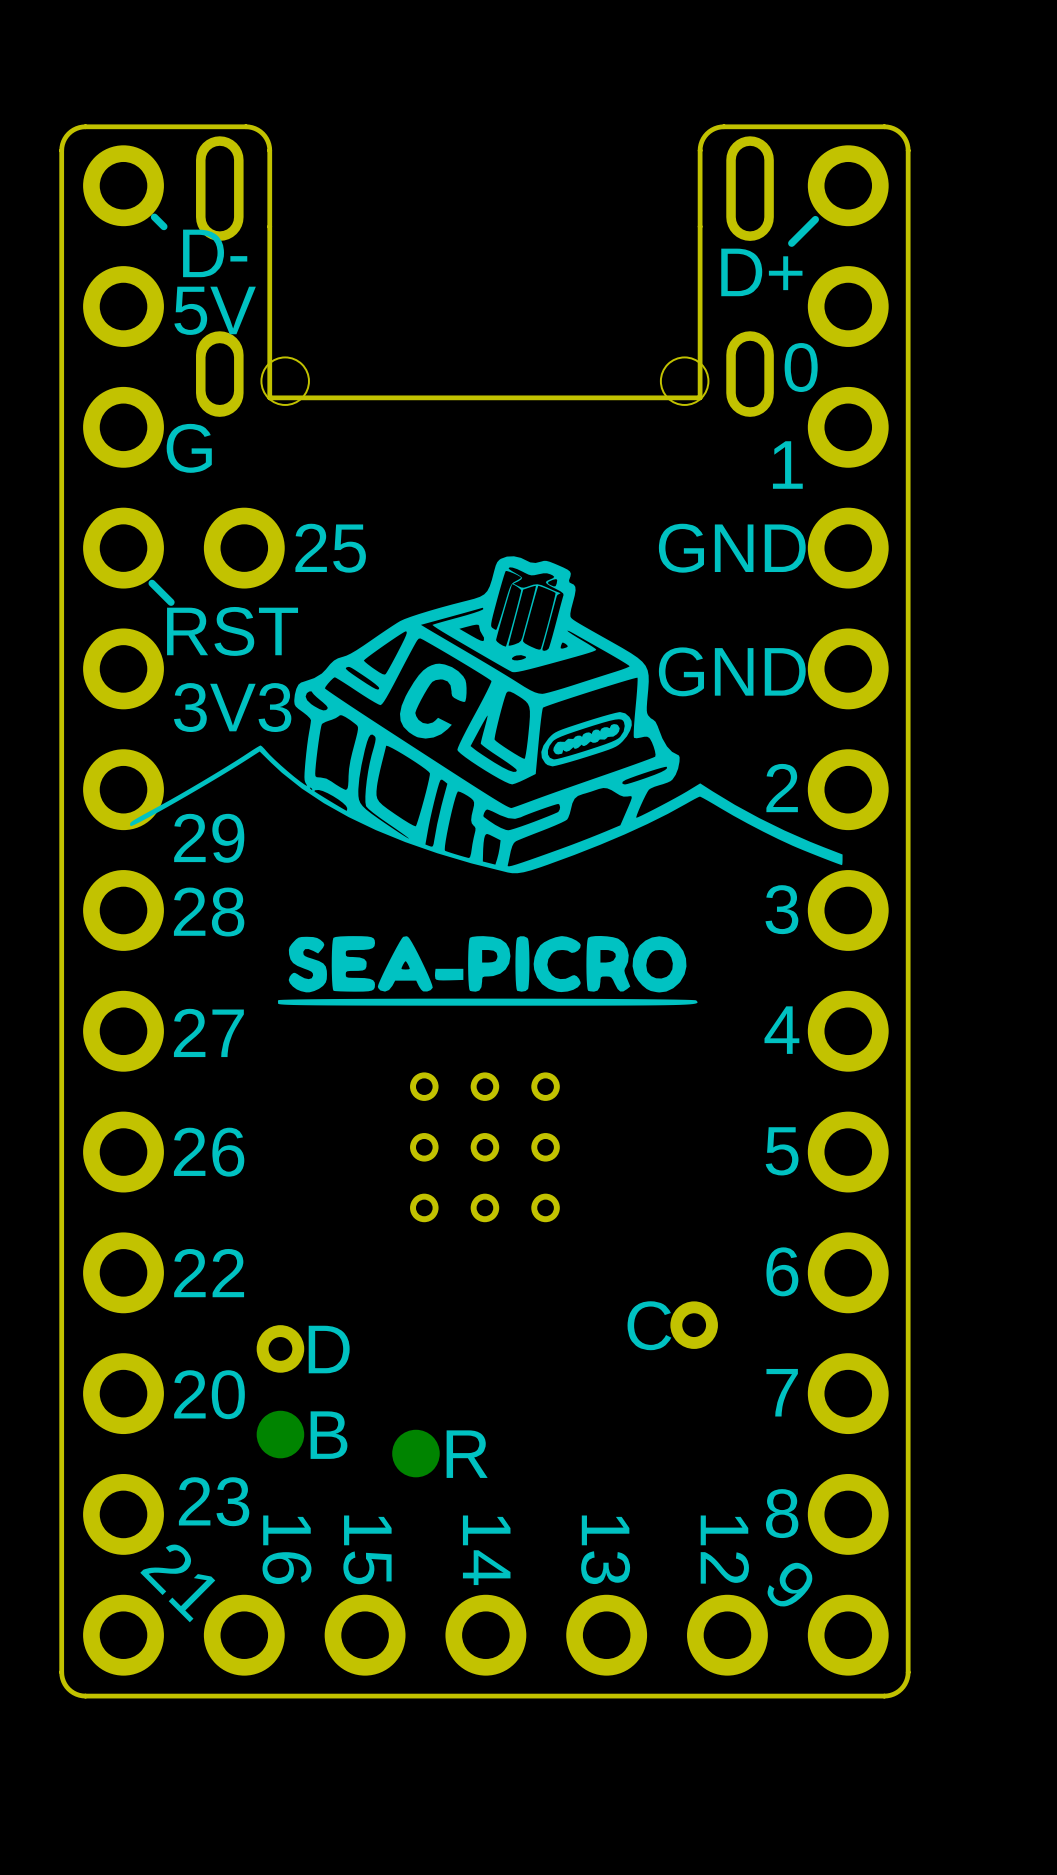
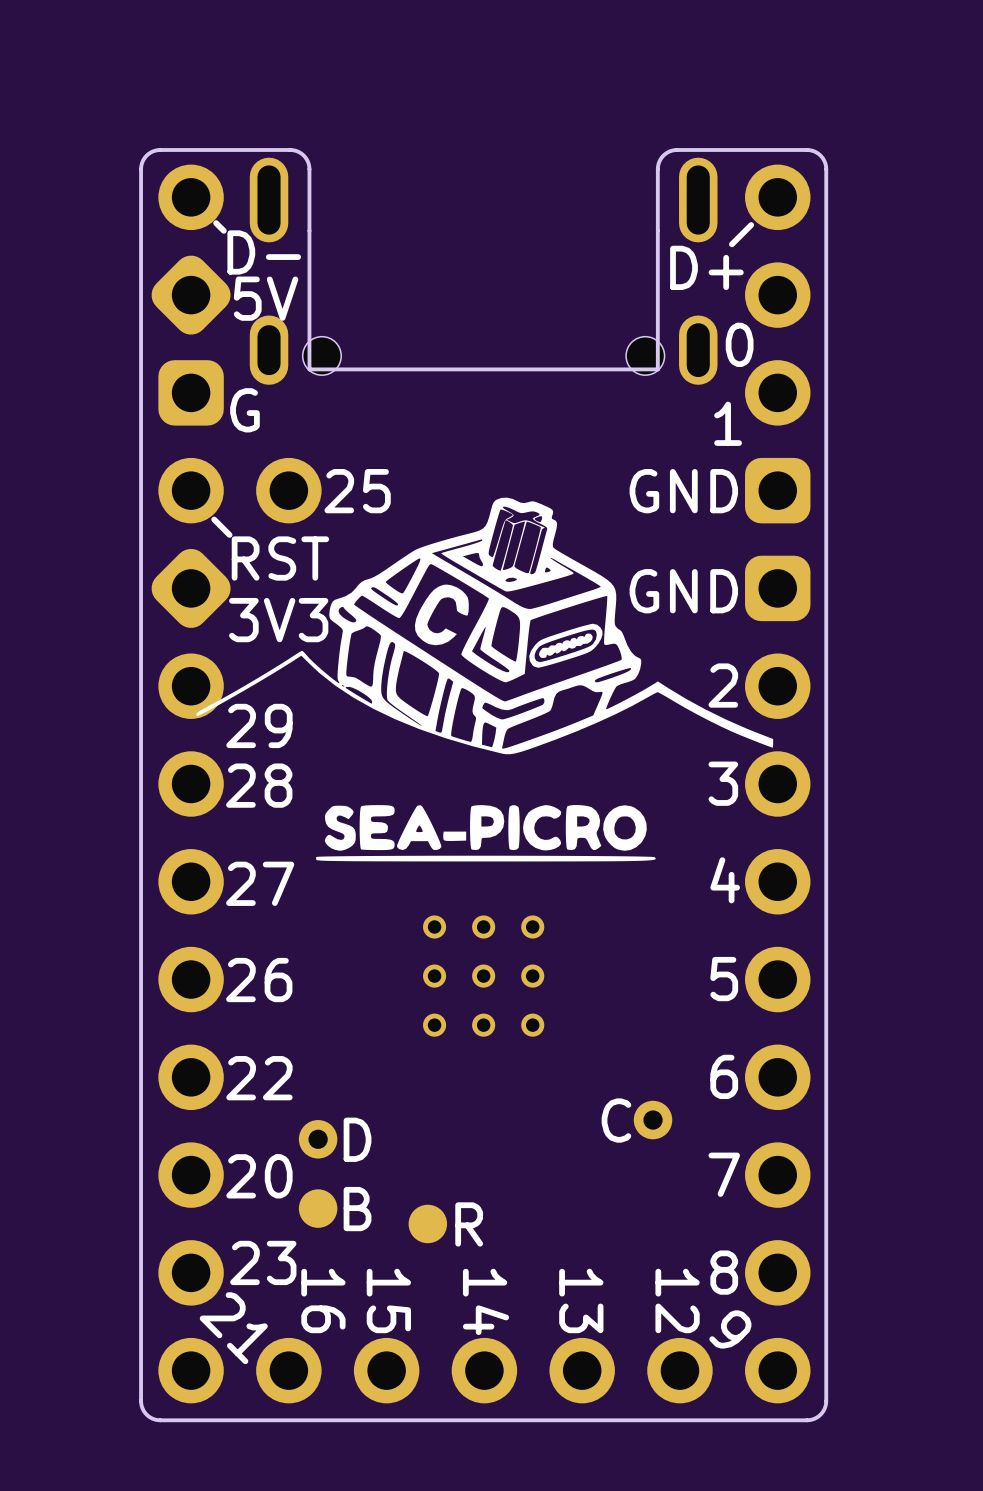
part: (123, 185) -> none
part: (848, 185) -> none
part: (244, 548) -> none
part: none -> (481, 783)
part: (123, 970) -> none
part: (848, 970) -> none
part: (485, 1635) -> none

